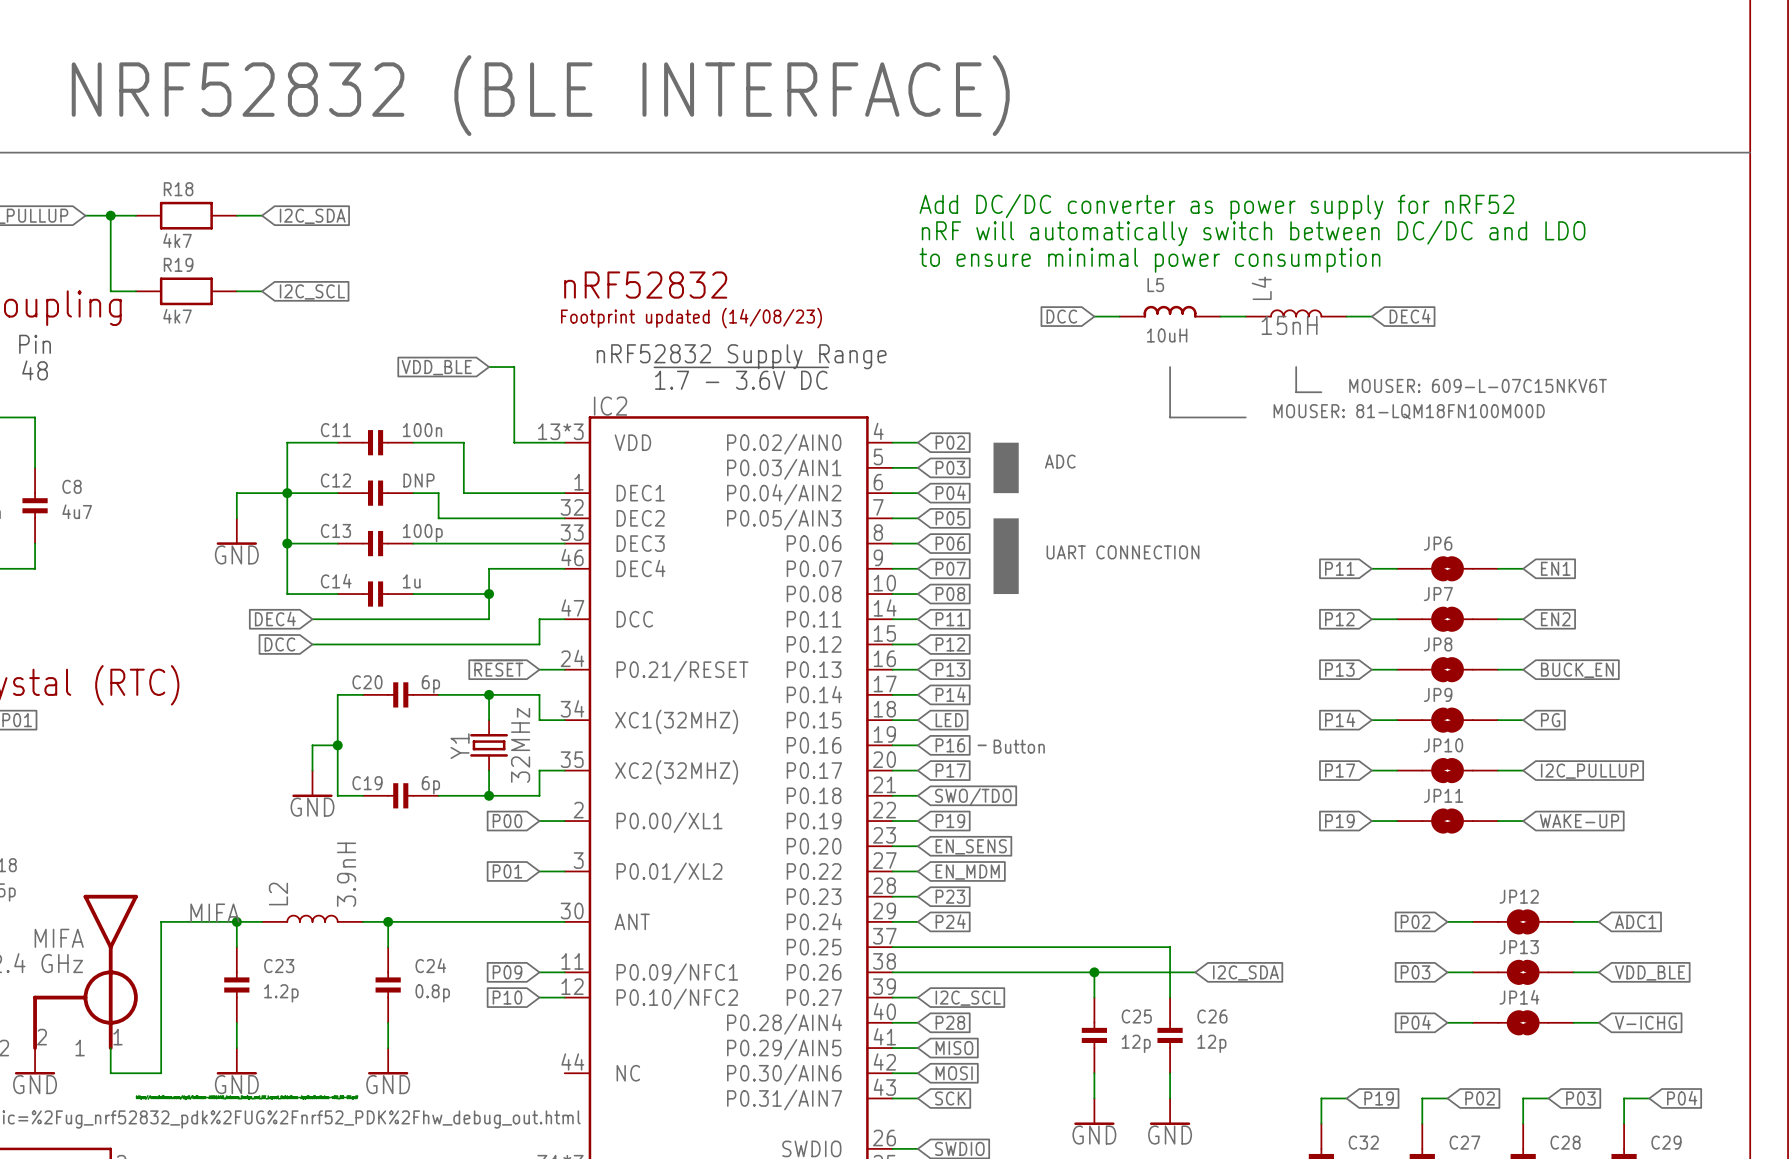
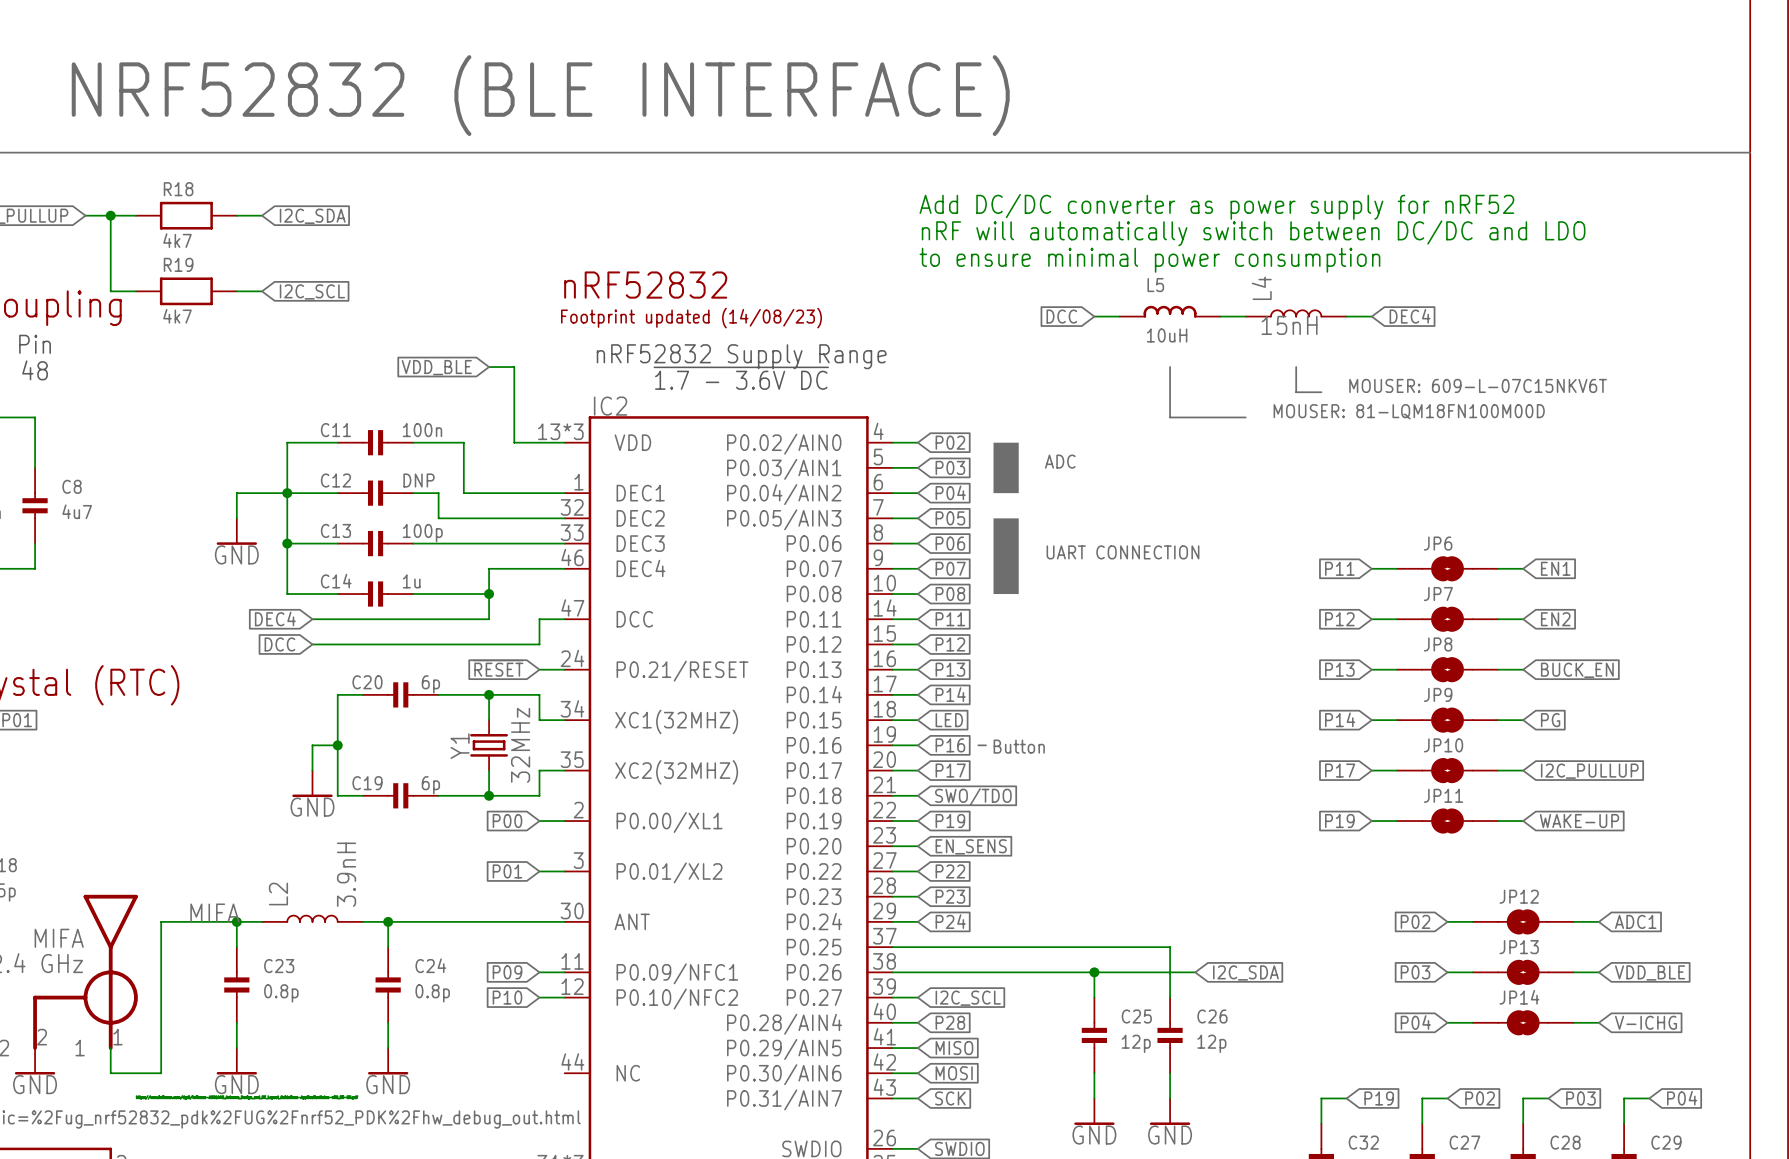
global label: EN_MDM (967, 872) -> P22 (950, 871)
C23 value: 1.2p (281, 993) -> 0.8p (281, 993)

